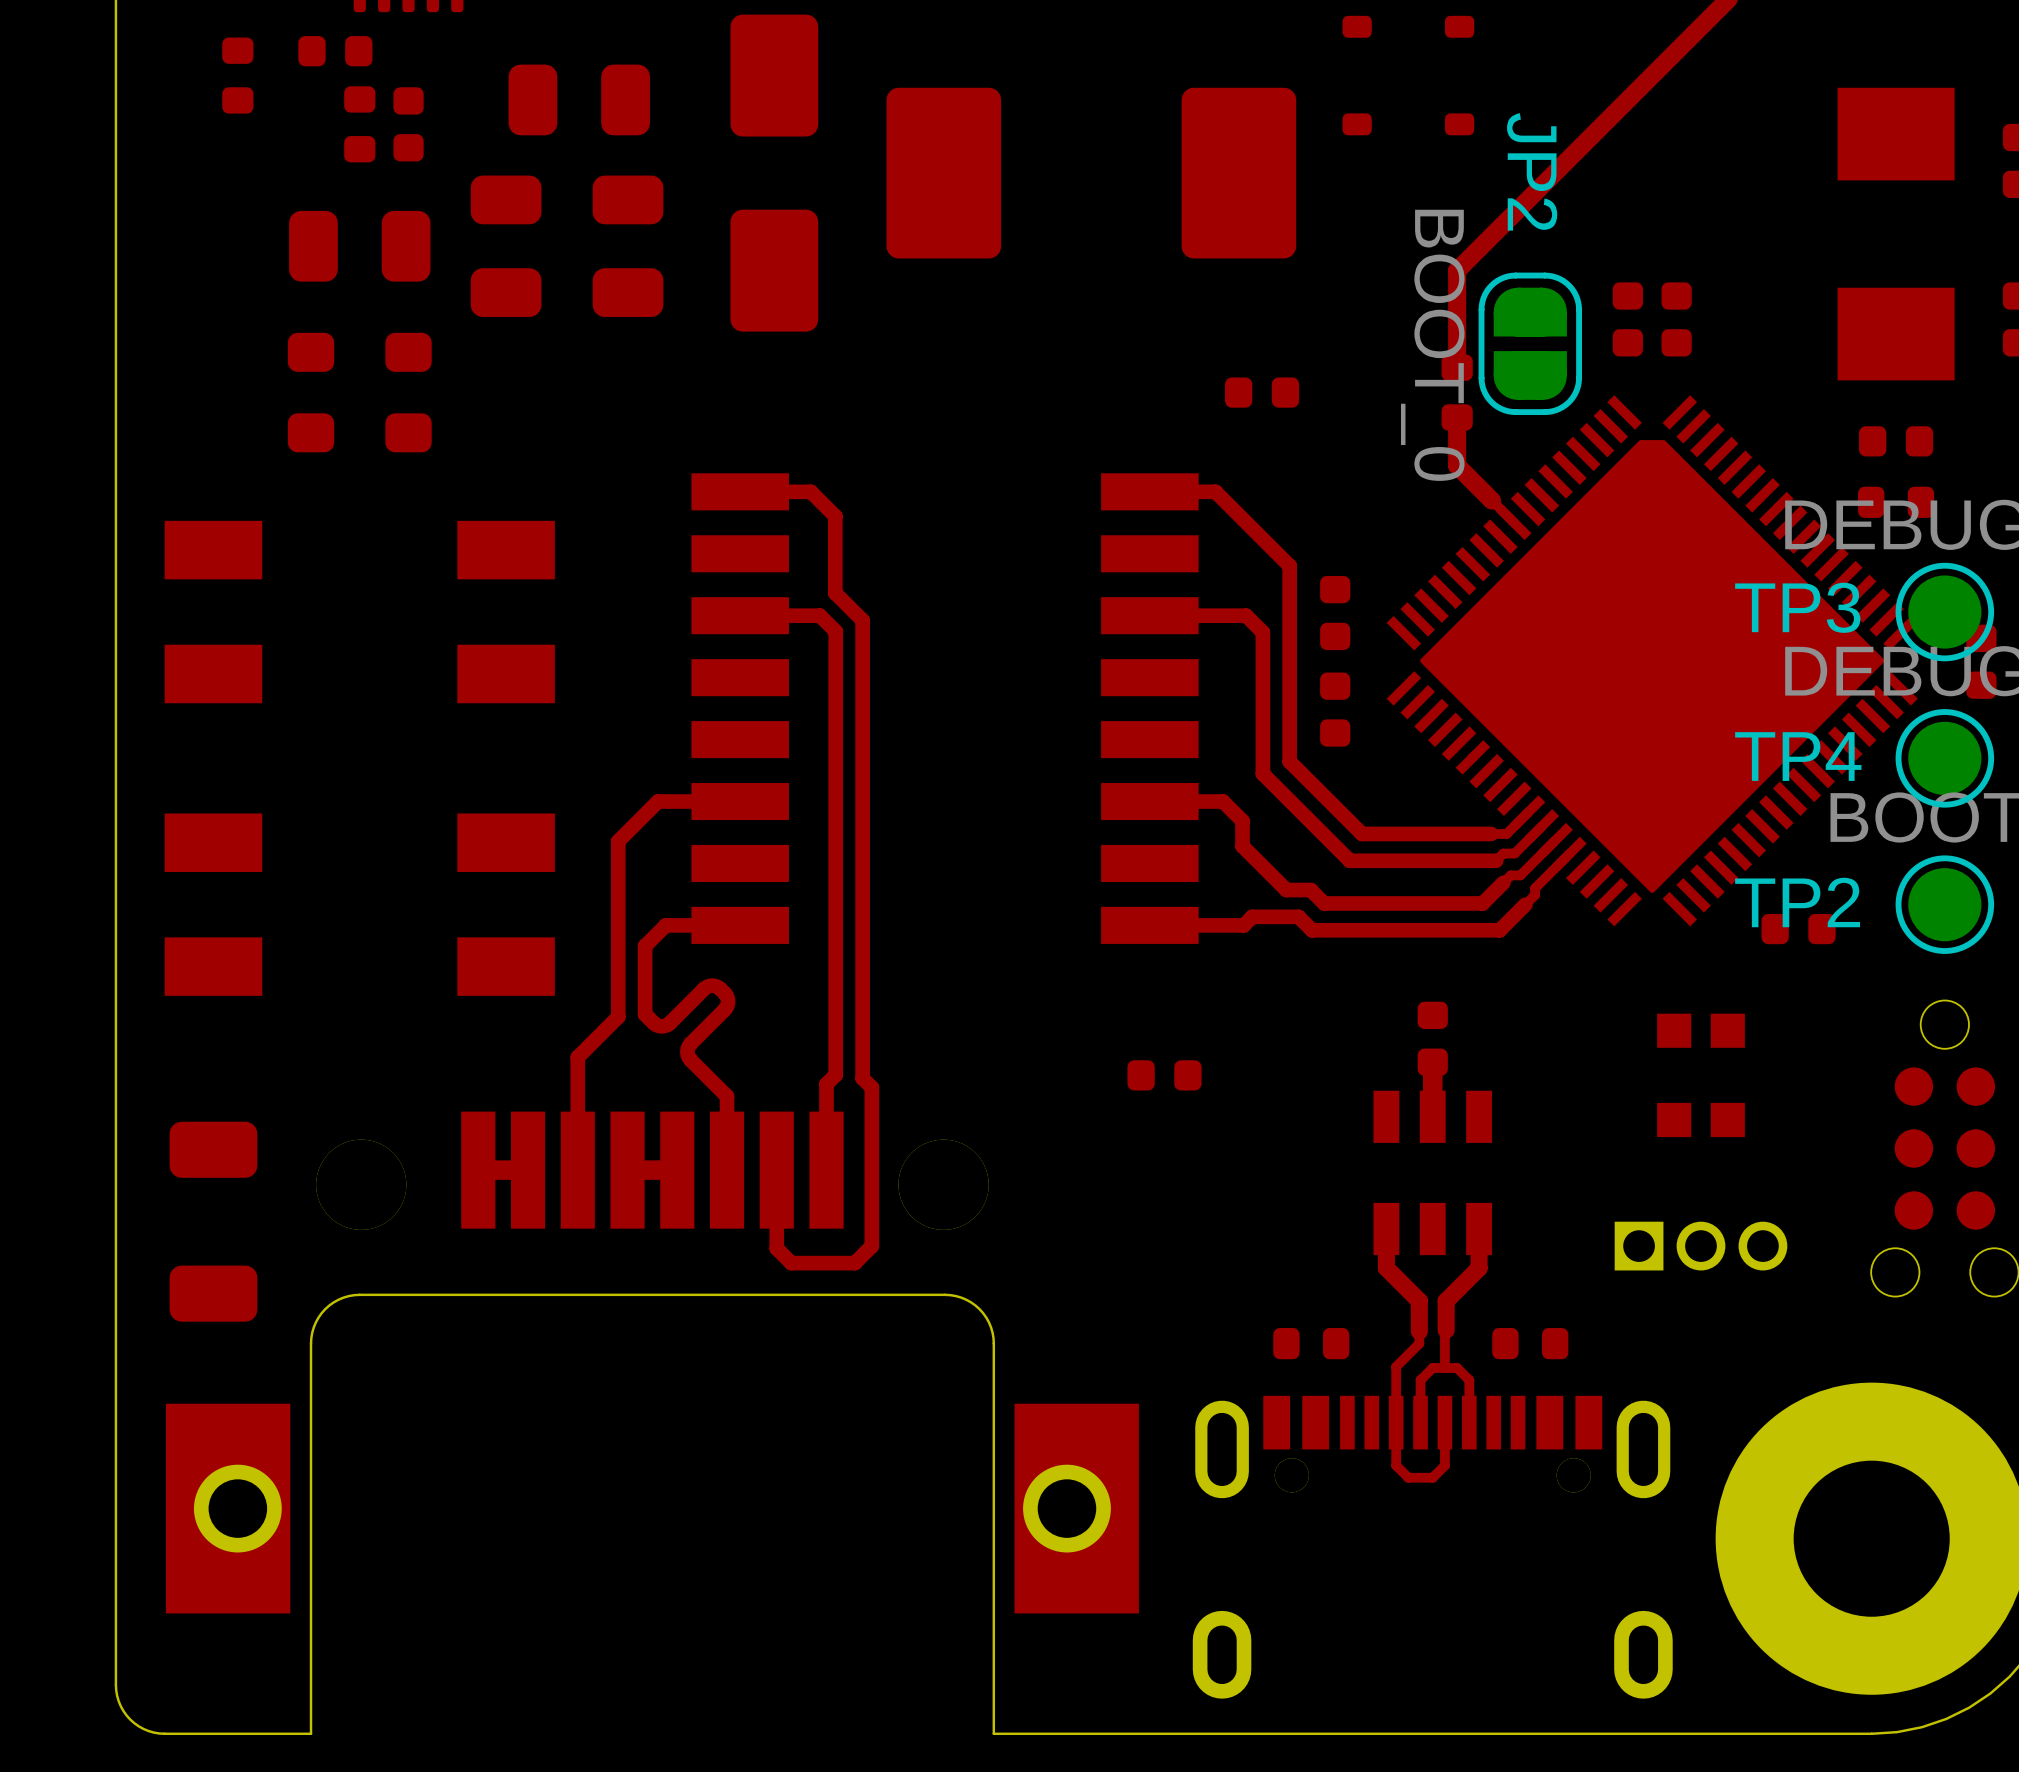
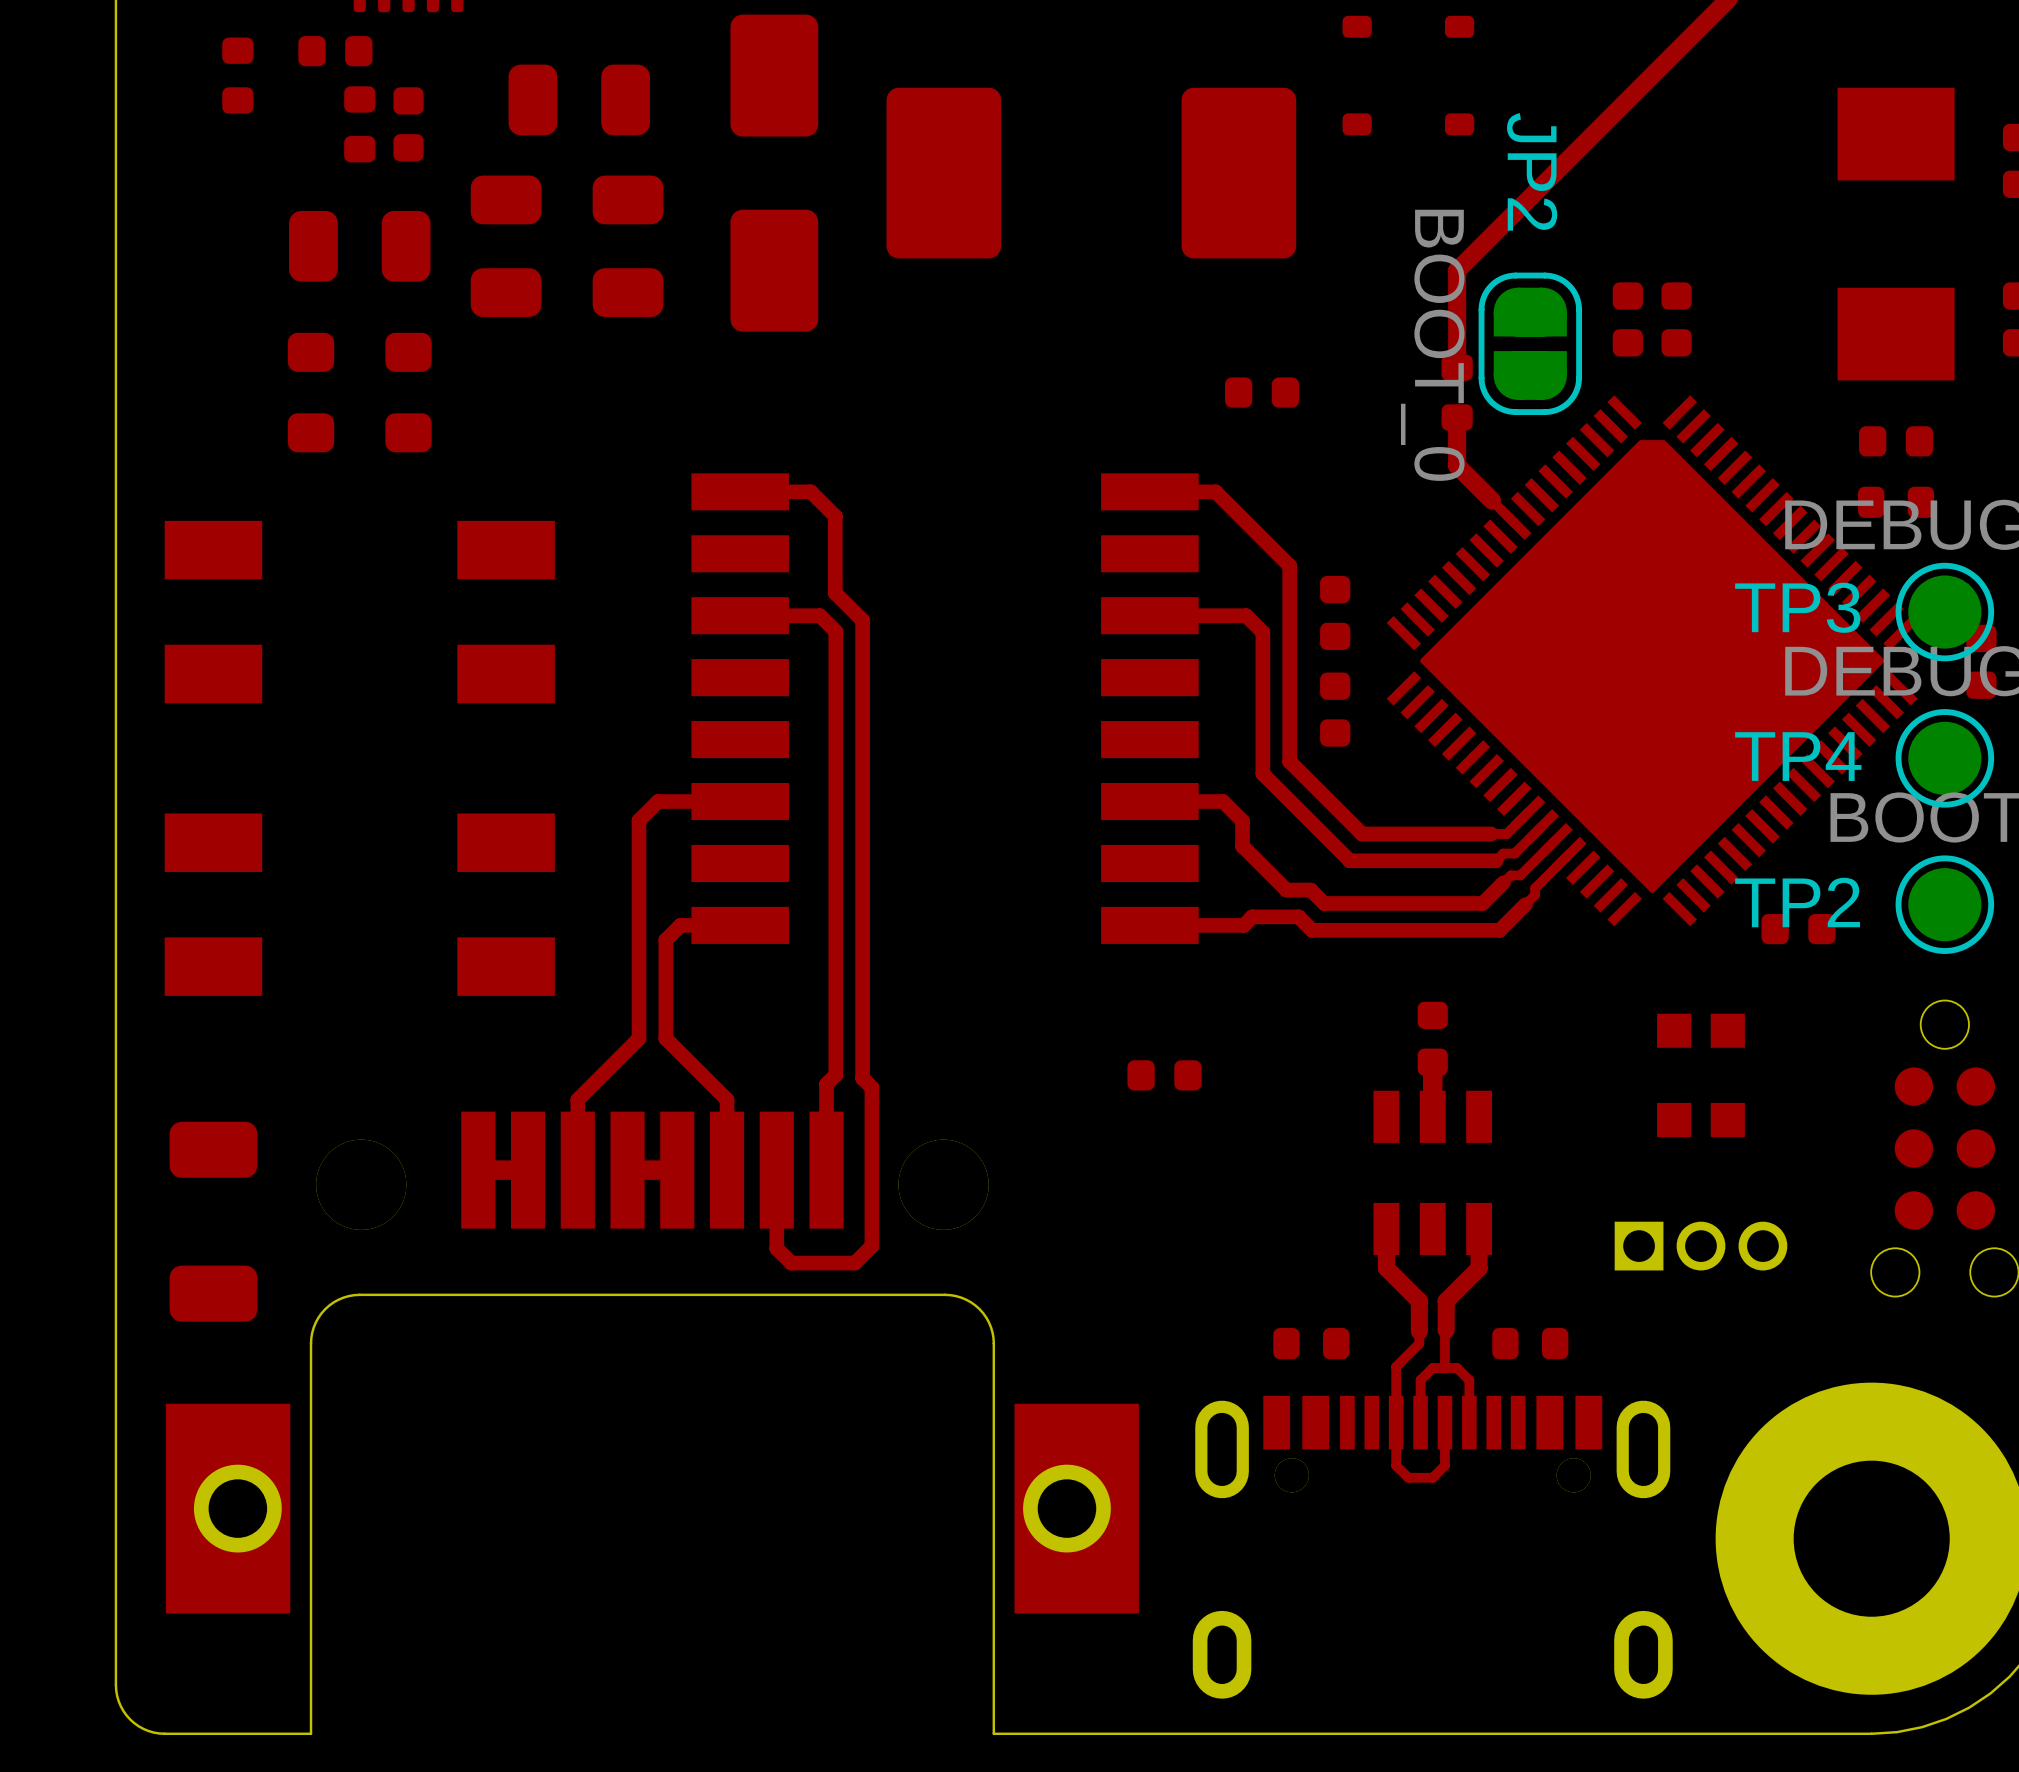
top track: (639, 820) (618, 841) (618, 1016) (577, 1057) (577, 1099) -> (639, 820) (639, 1038) (577, 1099)
top track: (680, 925) (665, 925) (645, 946) (645, 1014) (655, 1024) (664, 1026) (670, 1022) (707, 986) (716, 986) (724, 993) (727, 999) (726, 1007) (690, 1043) (687, 1051) (689, 1059) (727, 1096) (727, 1099) -> (680, 925) (665, 940) (665, 1038) (727, 1099)

